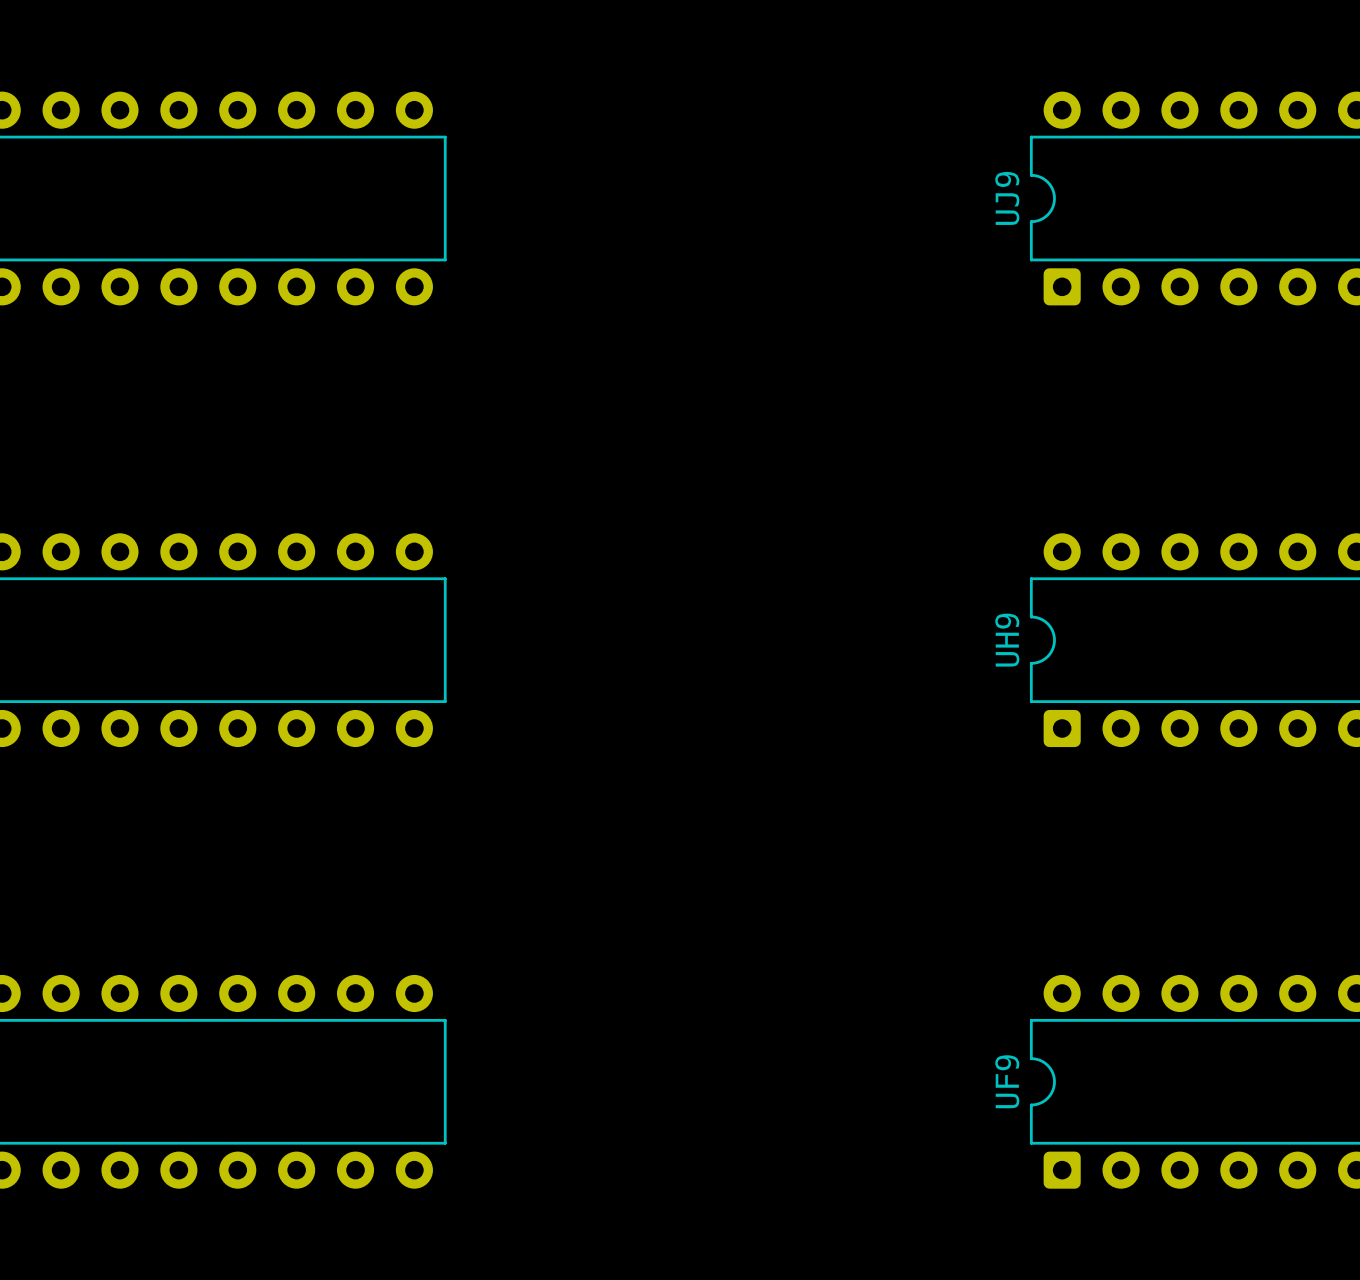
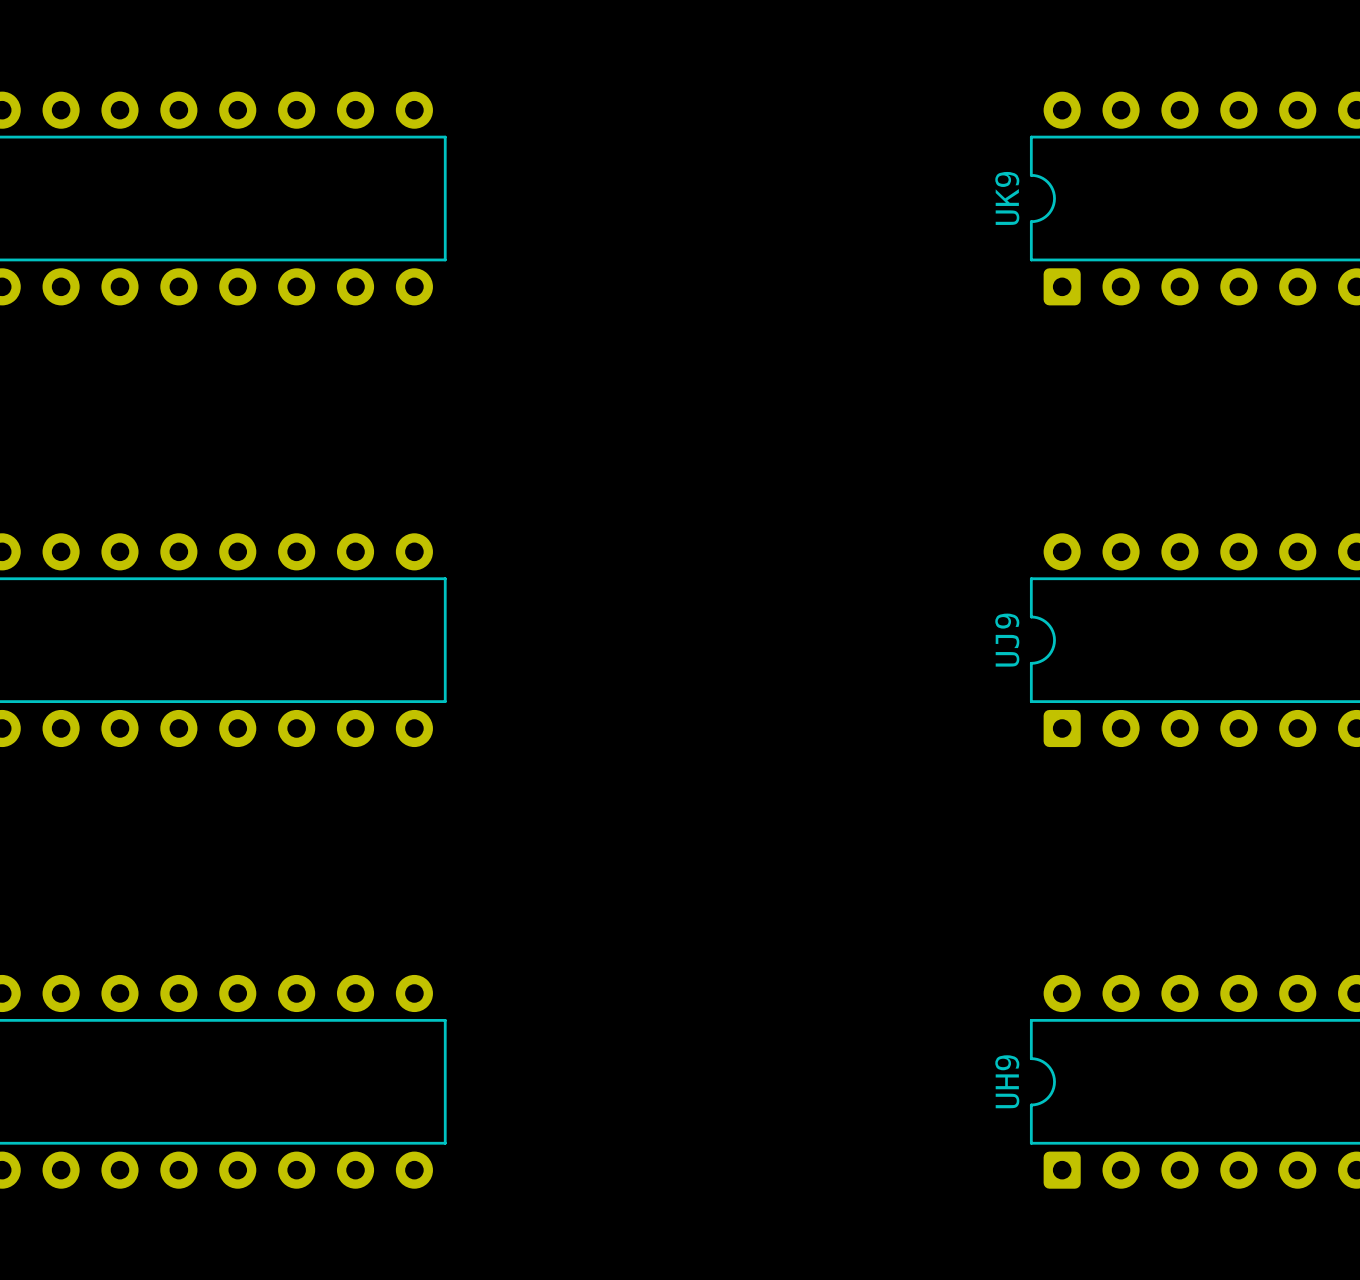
UJ9 name: UJ9 (1007, 198) -> UK9 (1007, 198)
UH9 name: UH9 (1007, 640) -> UJ9 (1007, 640)
UF9 name: UF9 (1007, 1081) -> UH9 (1007, 1081)

